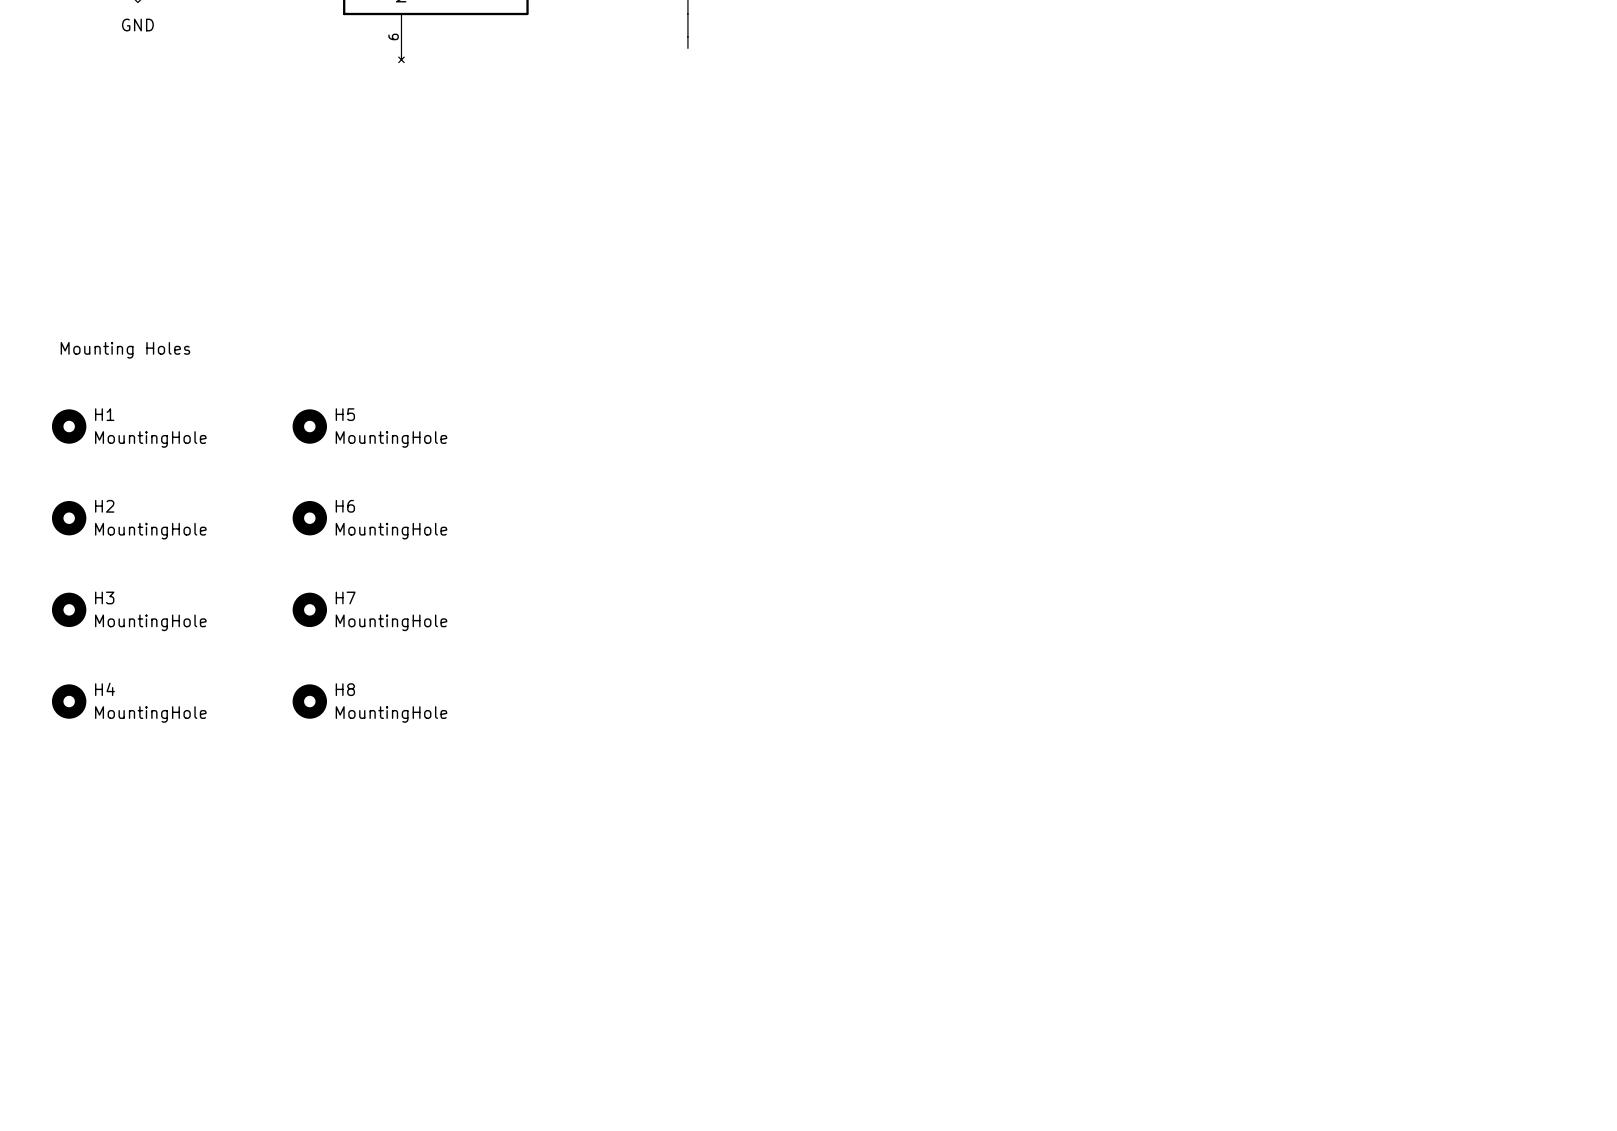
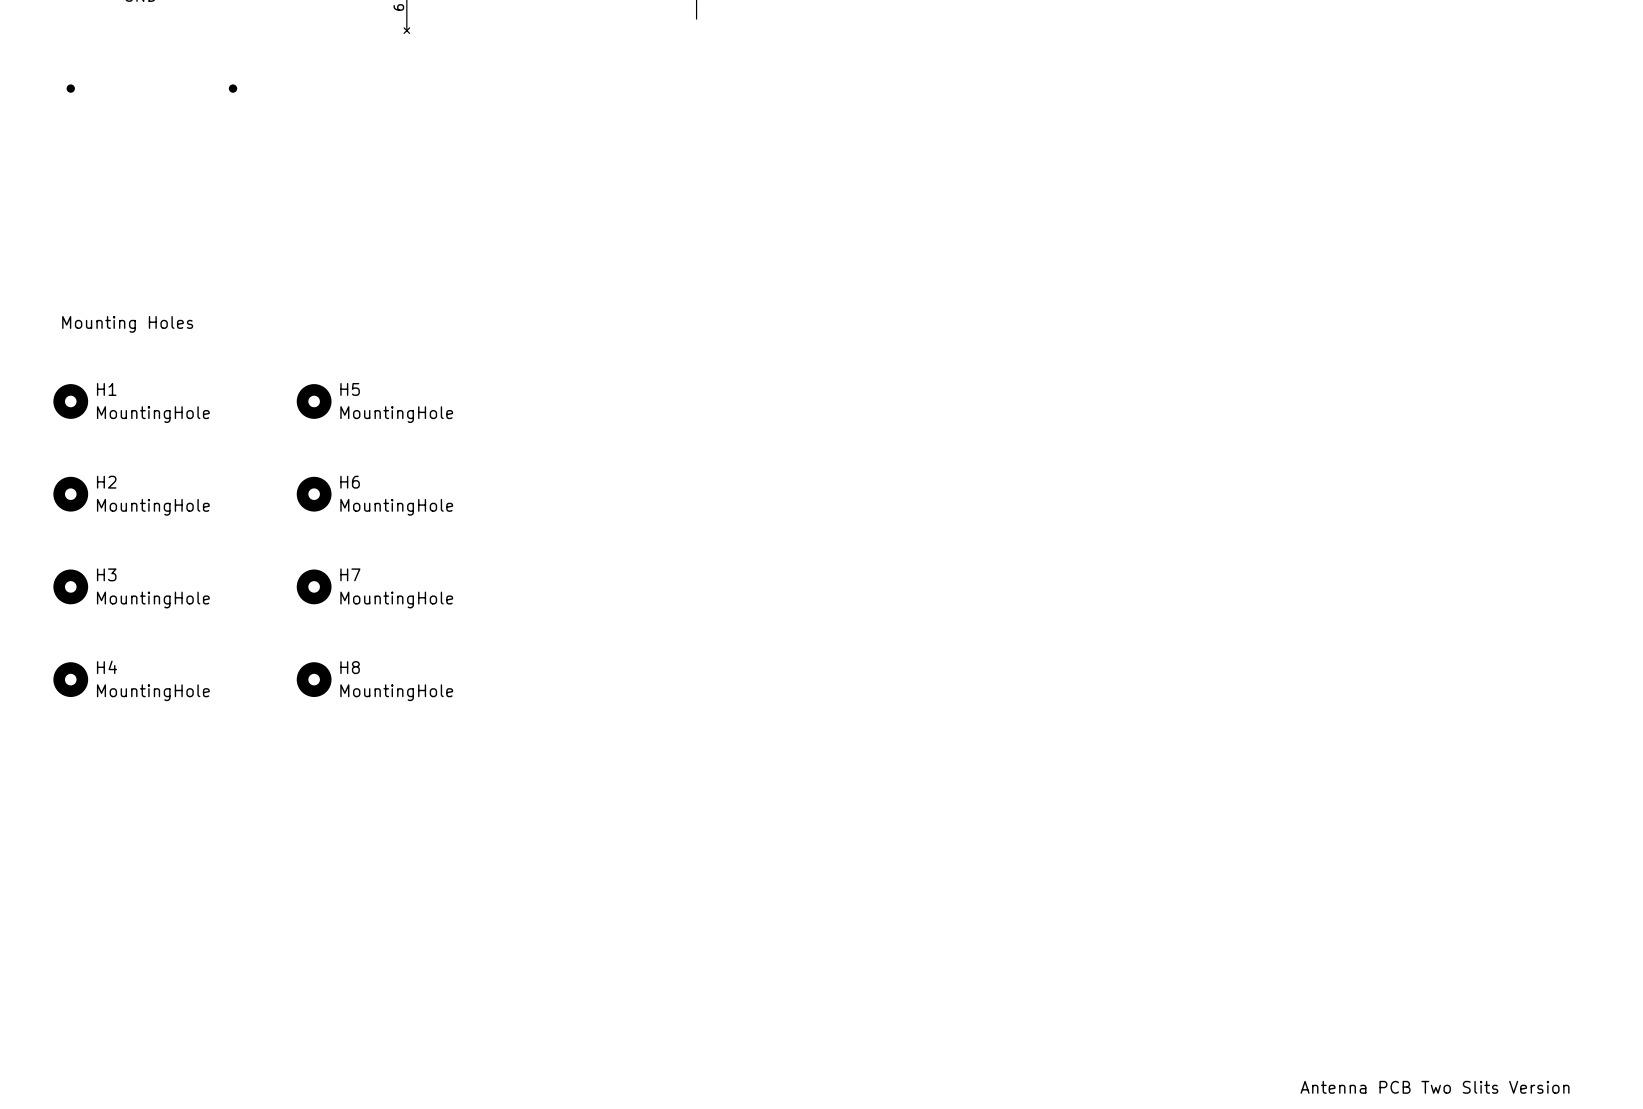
junction: none -> (70, 88)
junction: none -> (233, 88)
text: none -> Antenna PCB Two Slits Version (1435, 1087)

